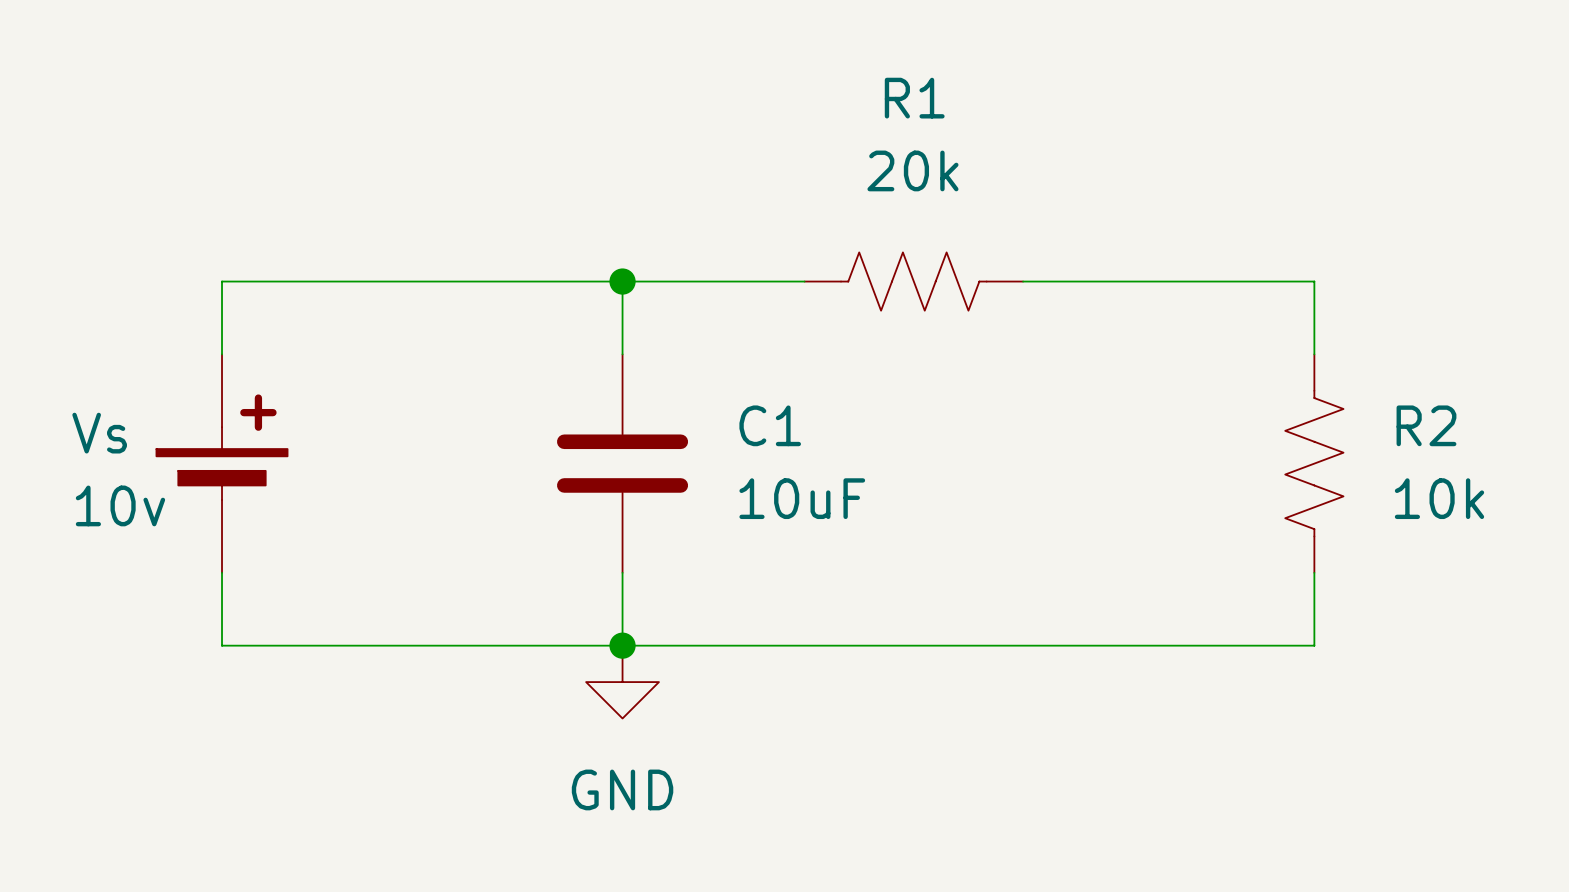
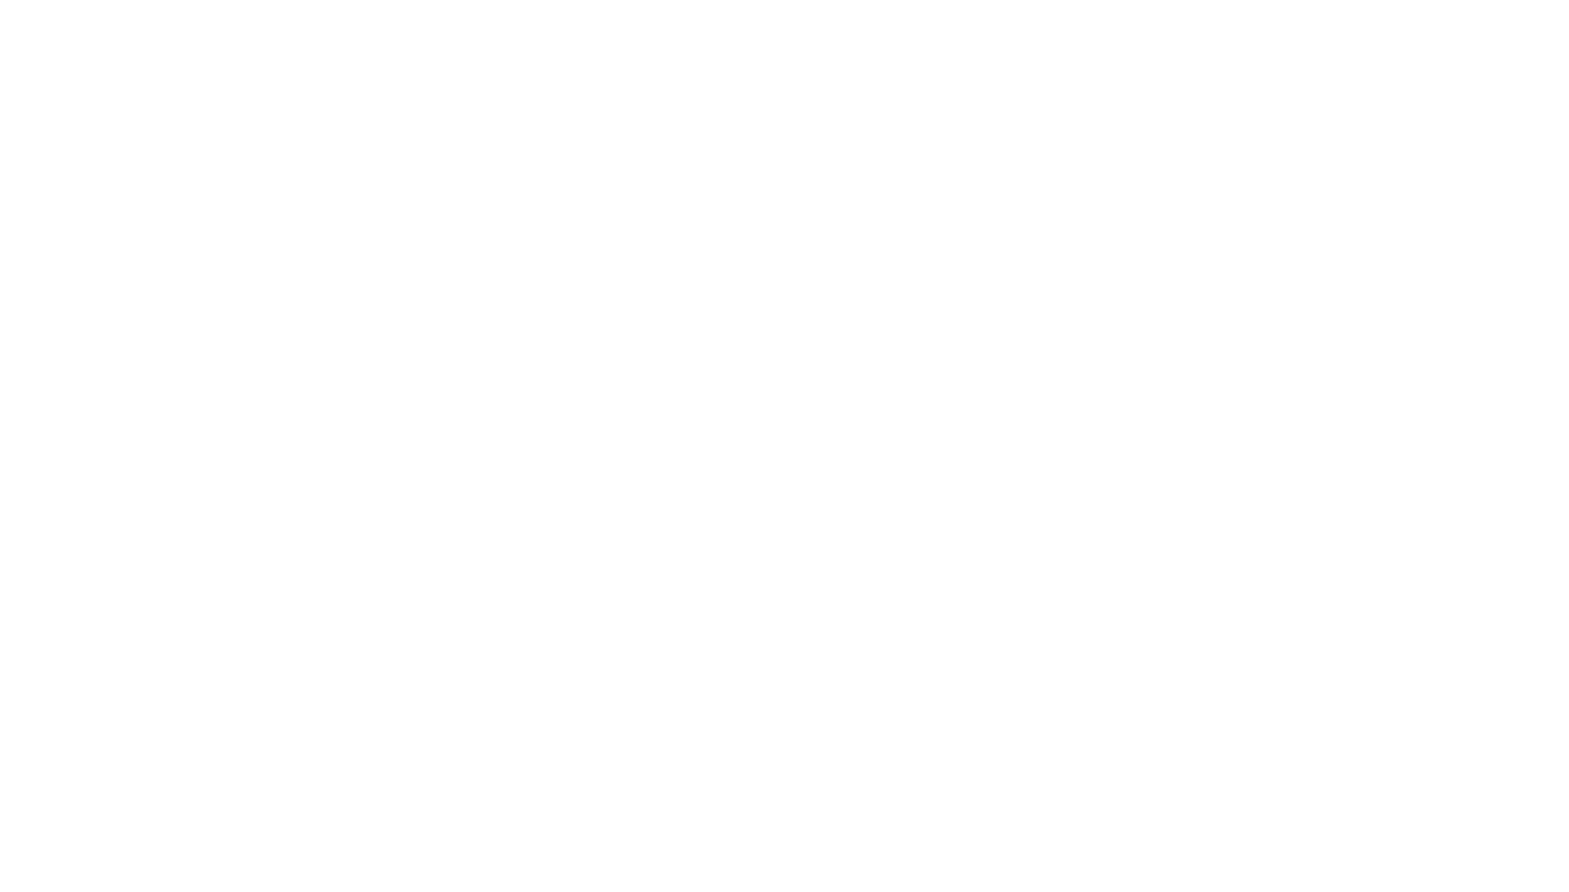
wire: (622, 281) (622, 354) -> none
junction: (622, 281) -> none
wire: (804, 281) (222, 281) (222, 354) -> none
R1: 20k (913, 281) -> none
wire: (1023, 281) (1314, 281) (1314, 354) -> none
Vs: 10v (222, 463) -> none
C1: 10uF (622, 463) -> none
R2: 10k (1314, 463) -> none
wire: (222, 572) (222, 645) (1314, 645) (1314, 572) -> none
wire: (622, 572) (622, 645) -> none
junction: (622, 645) -> none
power symbol: GND (622, 682) -> none

